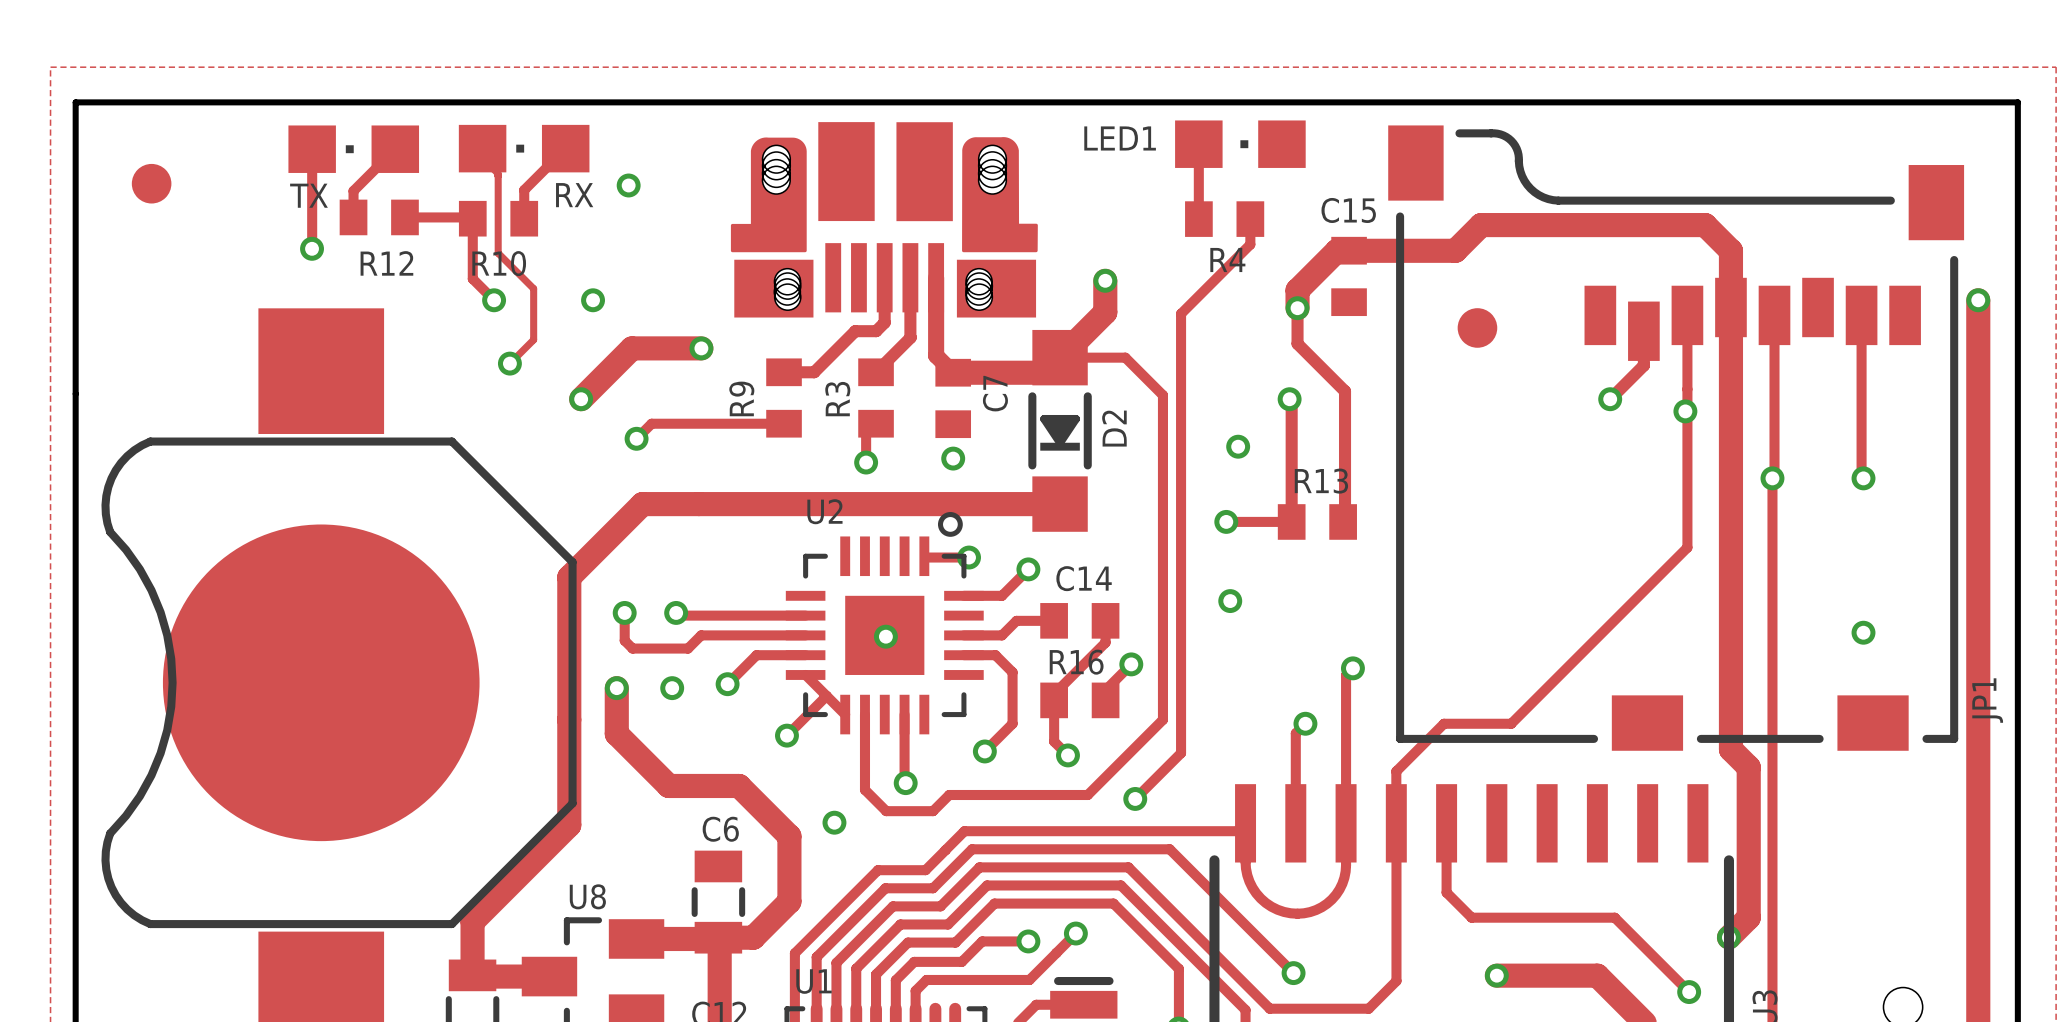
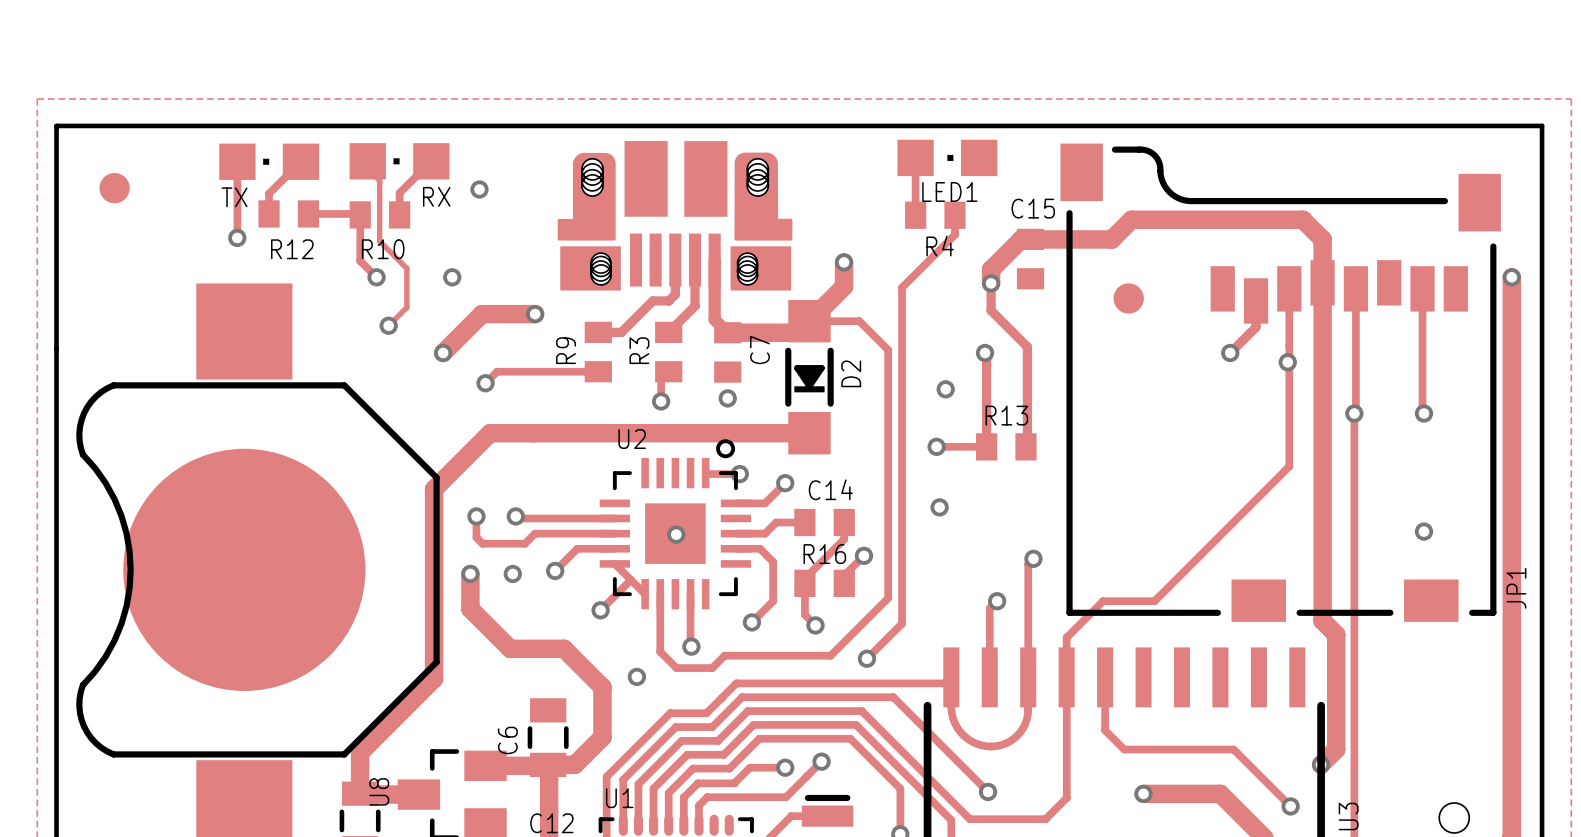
LED1 name position: LED1 (1120, 138) -> LED1 (949, 191)
C6 name rotation: 0° (720, 829) -> 90° counterclockwise (507, 740)
C6 name position: C6 (720, 829) -> C6 (507, 740)
U8 name rotation: 0° (587, 896) -> 90° counterclockwise (379, 791)
U8 name position: U8 (587, 896) -> U8 (379, 791)

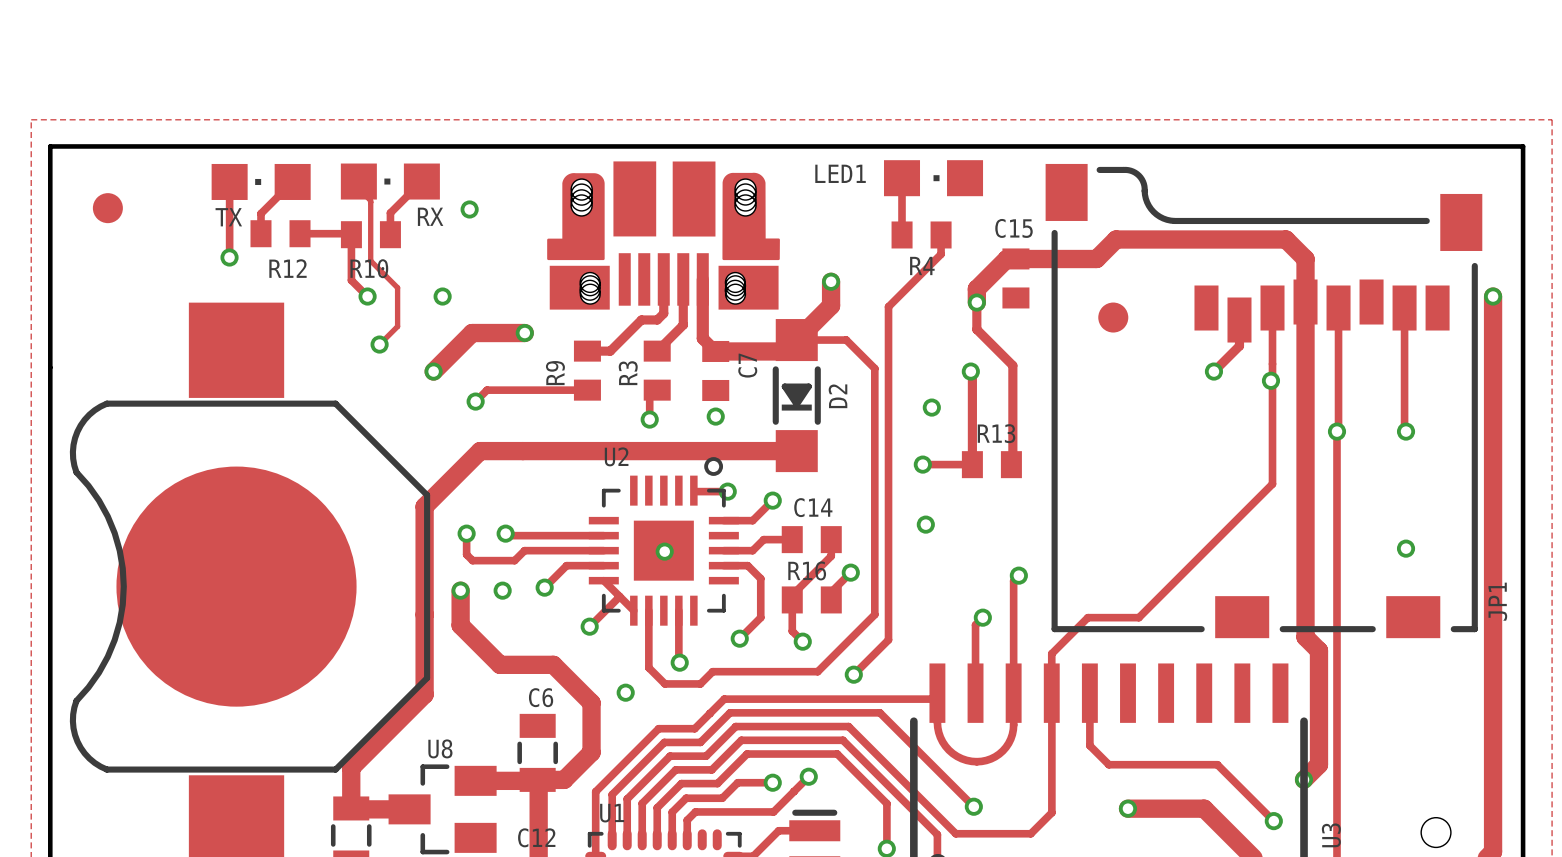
LED1 name position: LED1 (949, 191) -> LED1 (840, 173)
C6 name rotation: 0° (507, 740) -> 90° clockwise (541, 697)
C6 name position: C6 (507, 740) -> C6 (541, 697)
U8 name rotation: 0° (379, 791) -> 90° clockwise (440, 748)
U8 name position: U8 (379, 791) -> U8 (440, 748)

